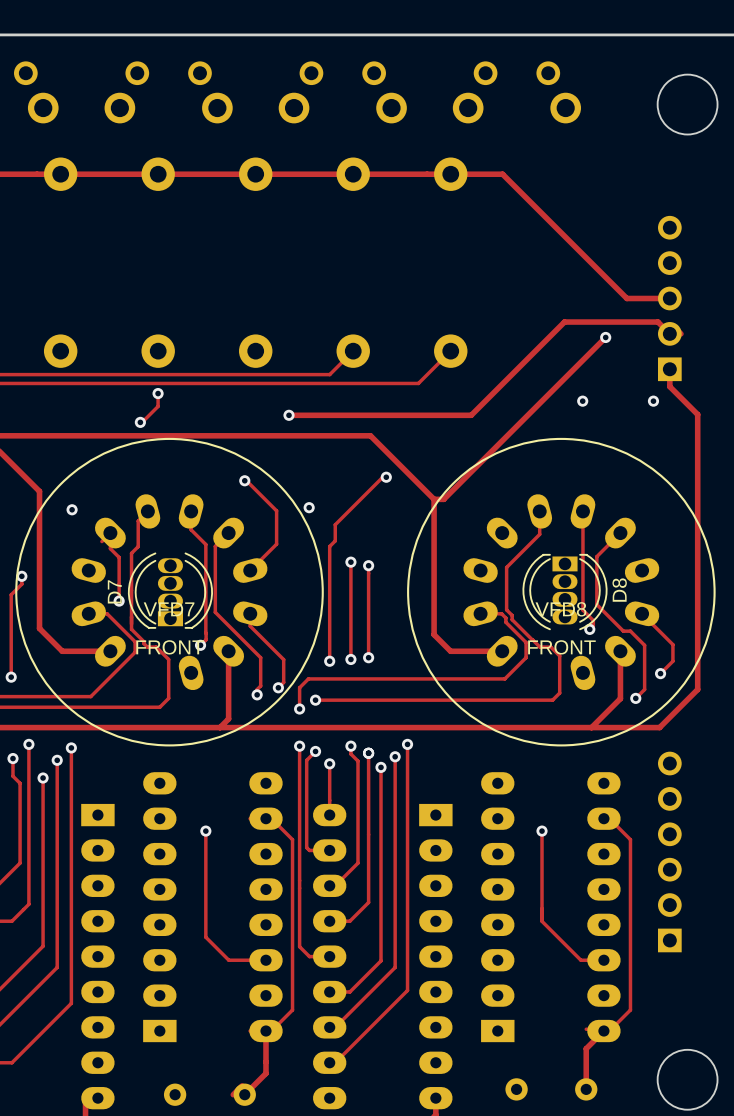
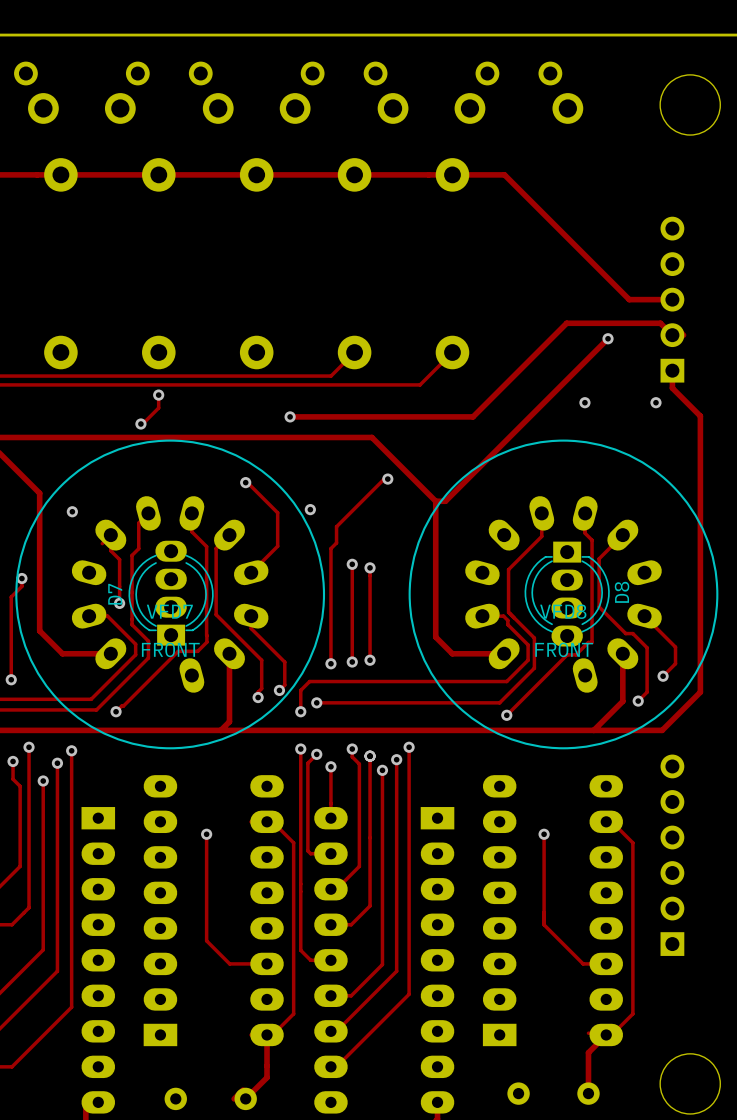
track: (582, 531) (582, 610) (593, 620) (593, 625) (589, 629) -> (585, 533) (592, 540) (592, 642) (588, 642) (575, 654) (567, 654) (506, 715)
D7 footprint: [127, 552, 213, 629] -> [128, 540, 214, 646]
D8 footprint: [522, 553, 608, 631] -> [524, 541, 610, 647]
track: (512, 615) (512, 619) (539, 647) (550, 647) (559, 655) (559, 693) (552, 700) (497, 700) -> (514, 617) (534, 638) (534, 668) (499, 702)
track: (131, 622) (131, 629) (143, 643) (147, 647) (156, 647) (168, 659) (168, 698) (159, 707) (96, 707) -> (132, 624) (148, 641) (148, 658) (96, 709)
via: (589, 629) -> none
track: none -> (201, 647) (197, 651) (178, 651) (116, 711)
via: (200, 645) -> none
via: none -> (116, 711)
via: none -> (506, 715)

